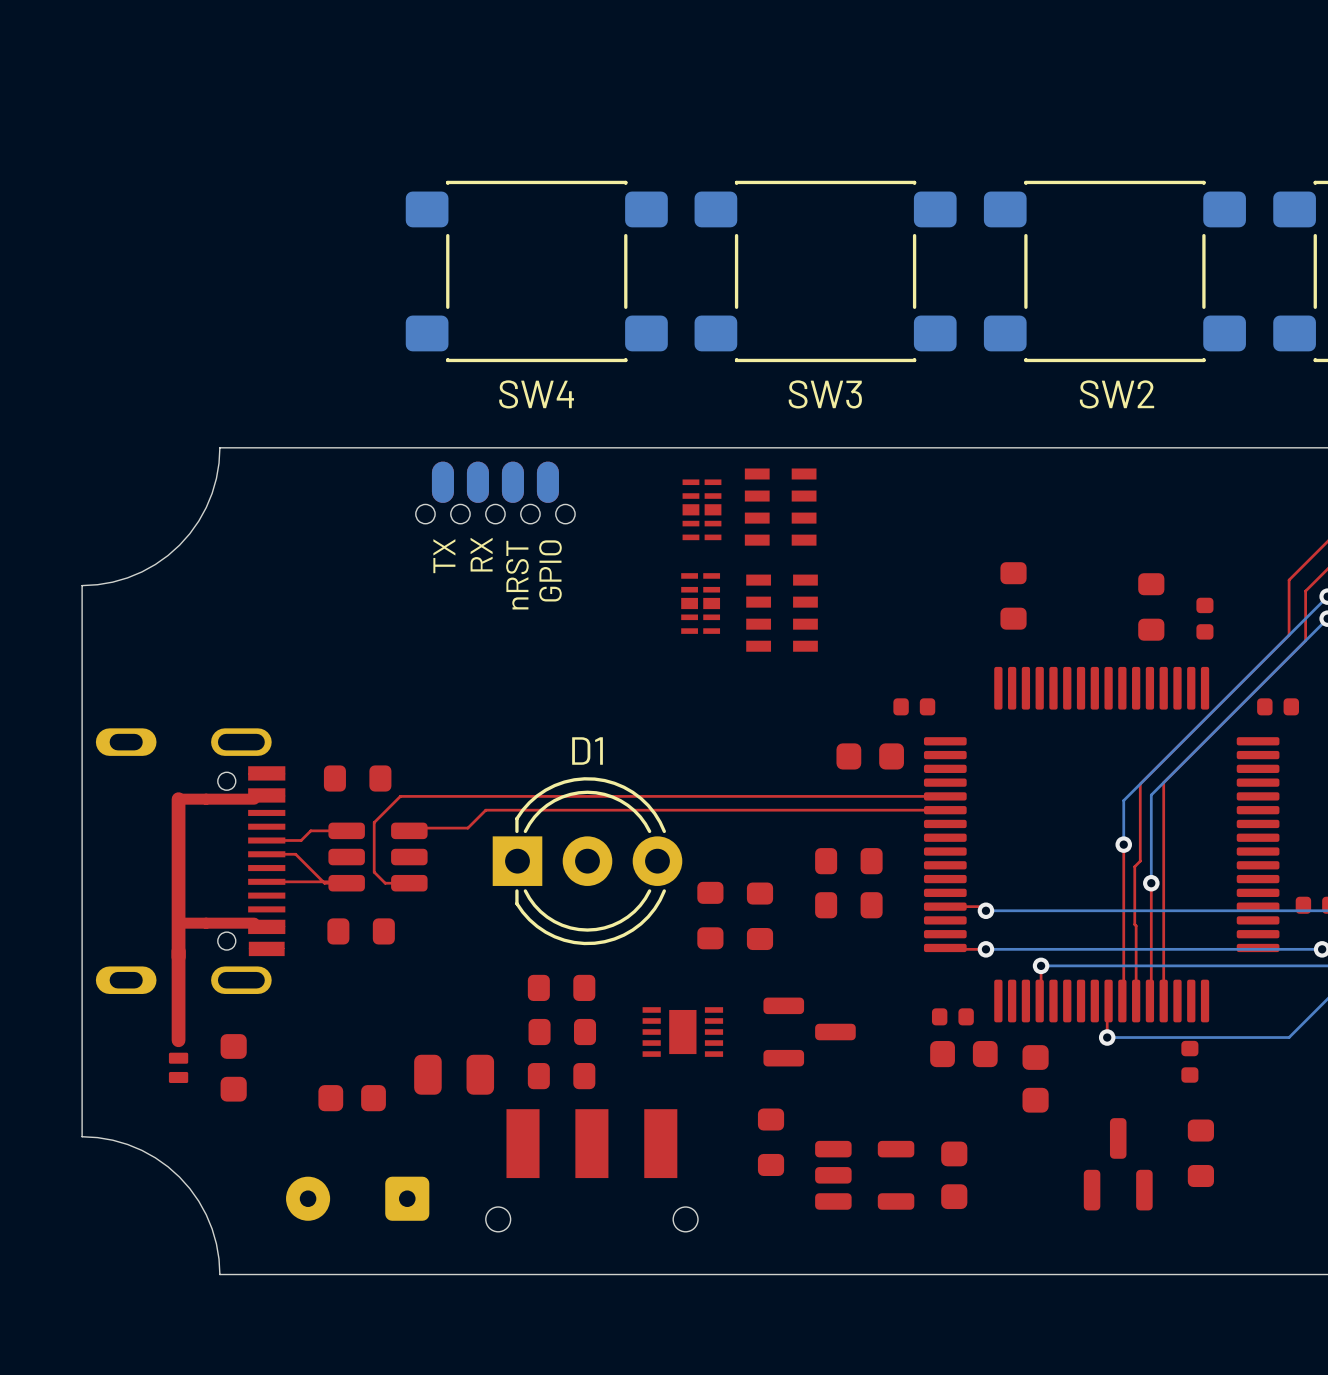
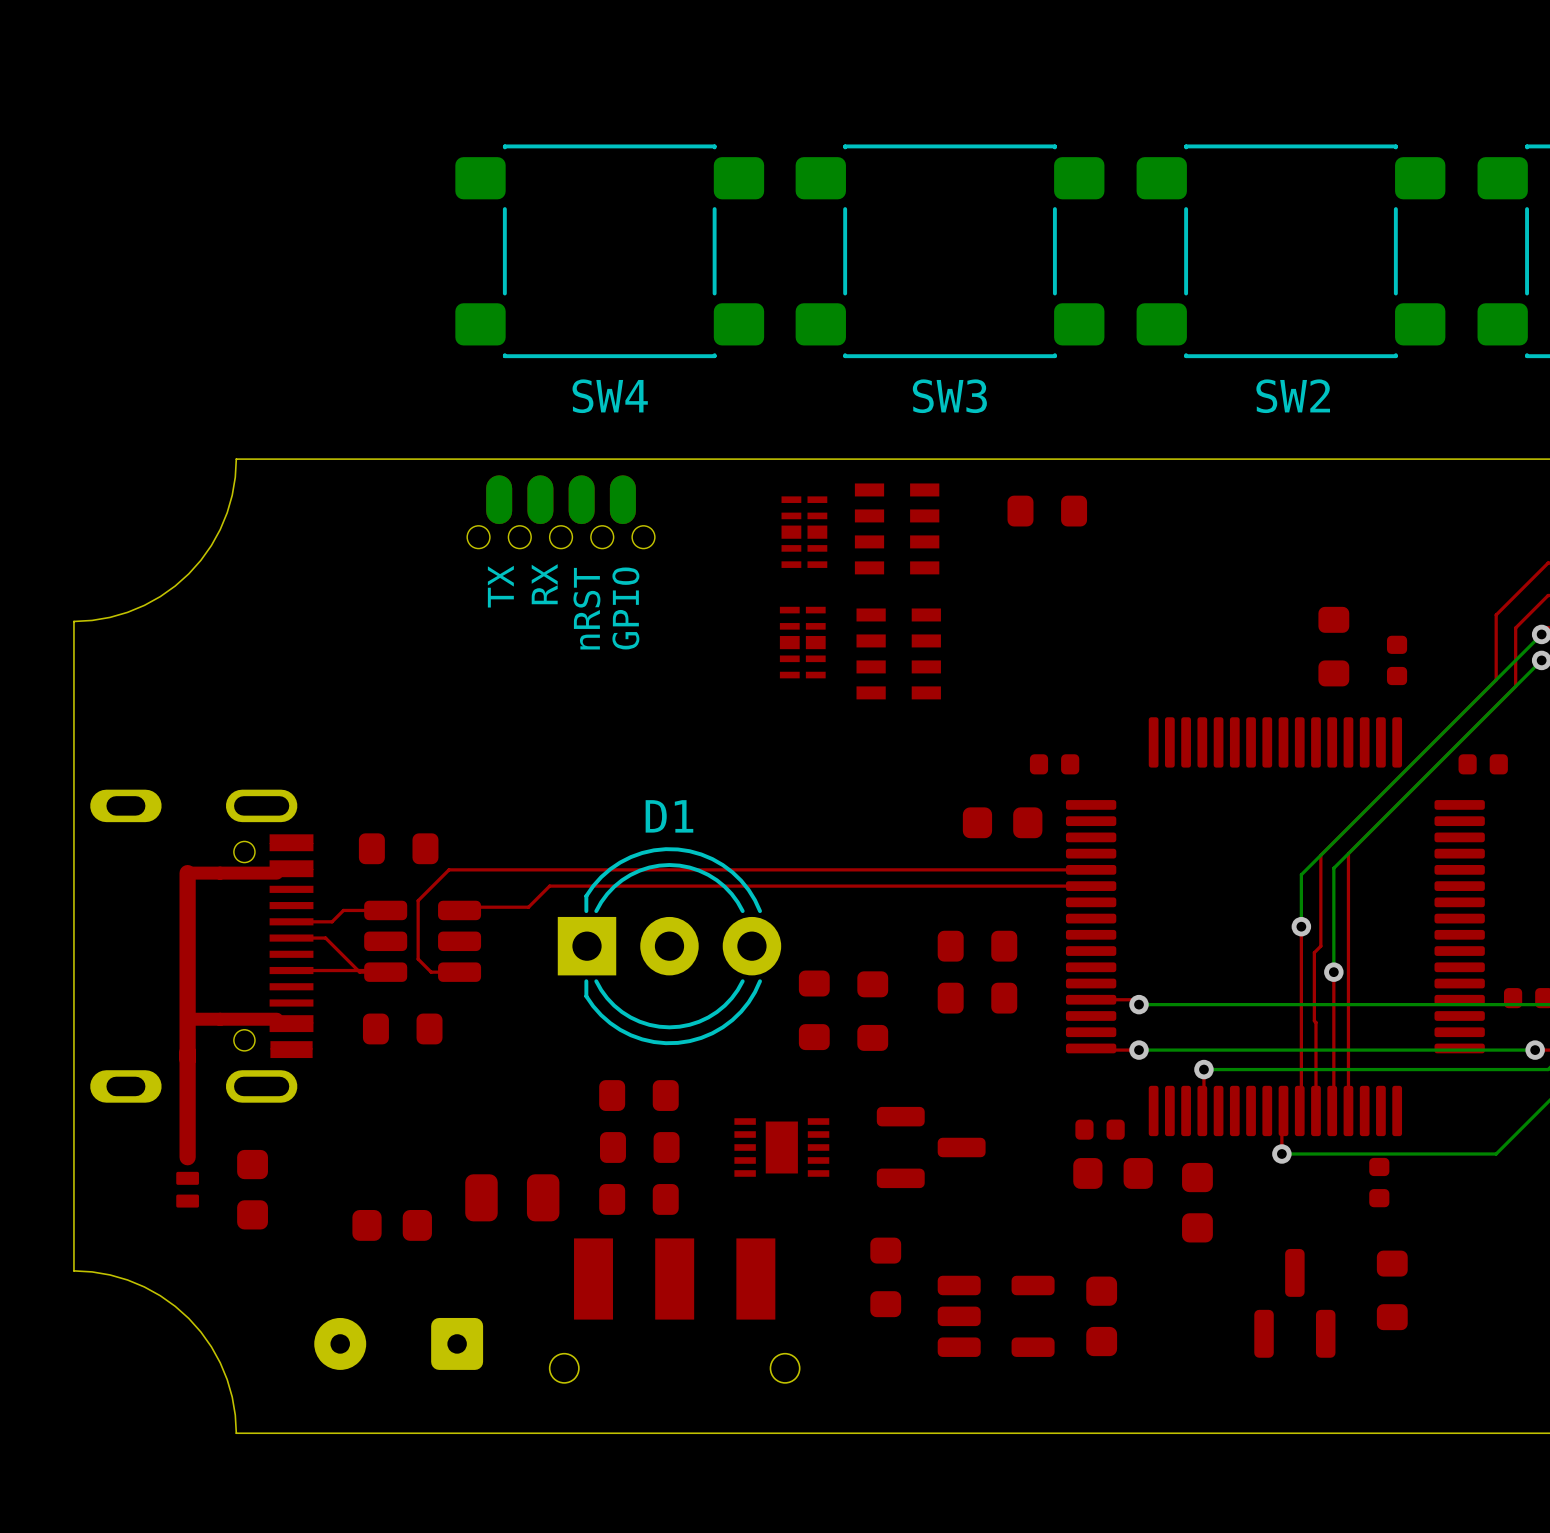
part rotation: 0° (1013, 595) -> 90° clockwise (1047, 511)
part position: (1013, 595) -> (1047, 511)

